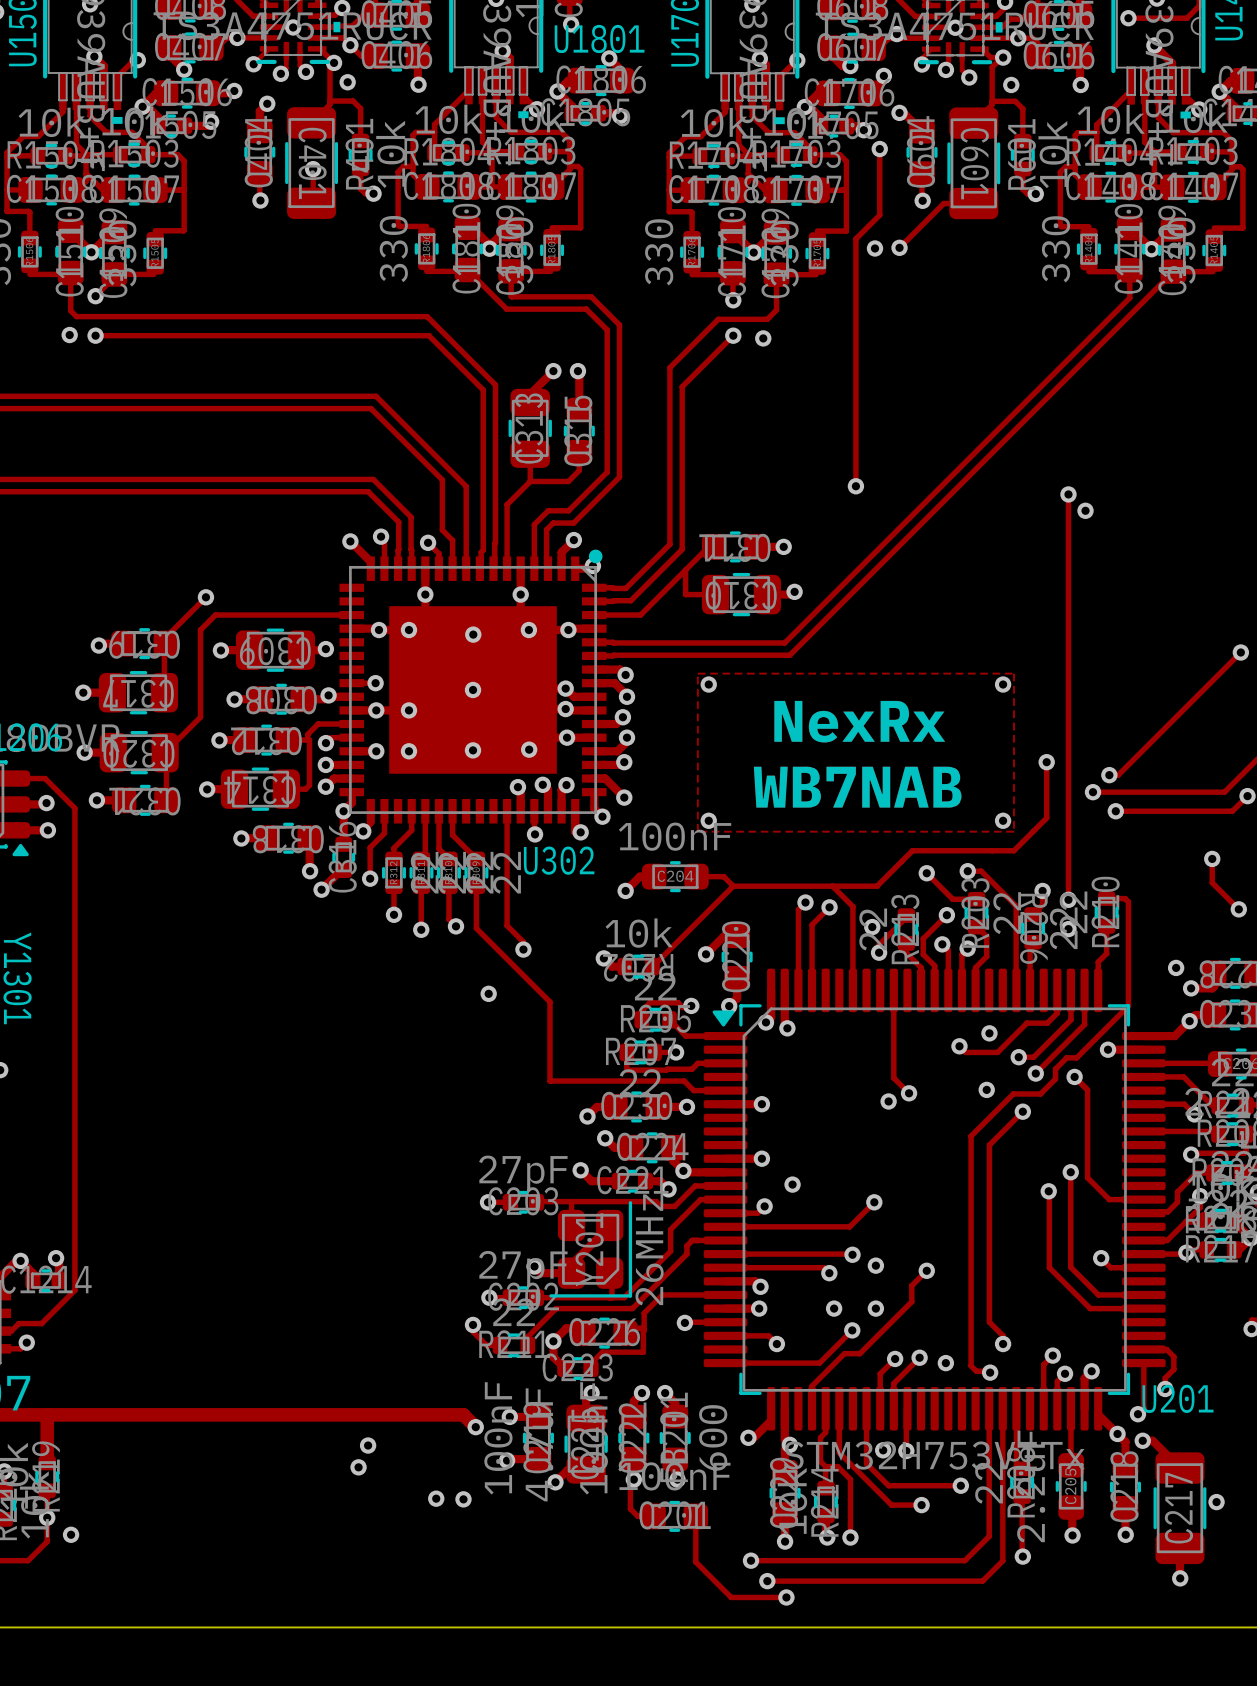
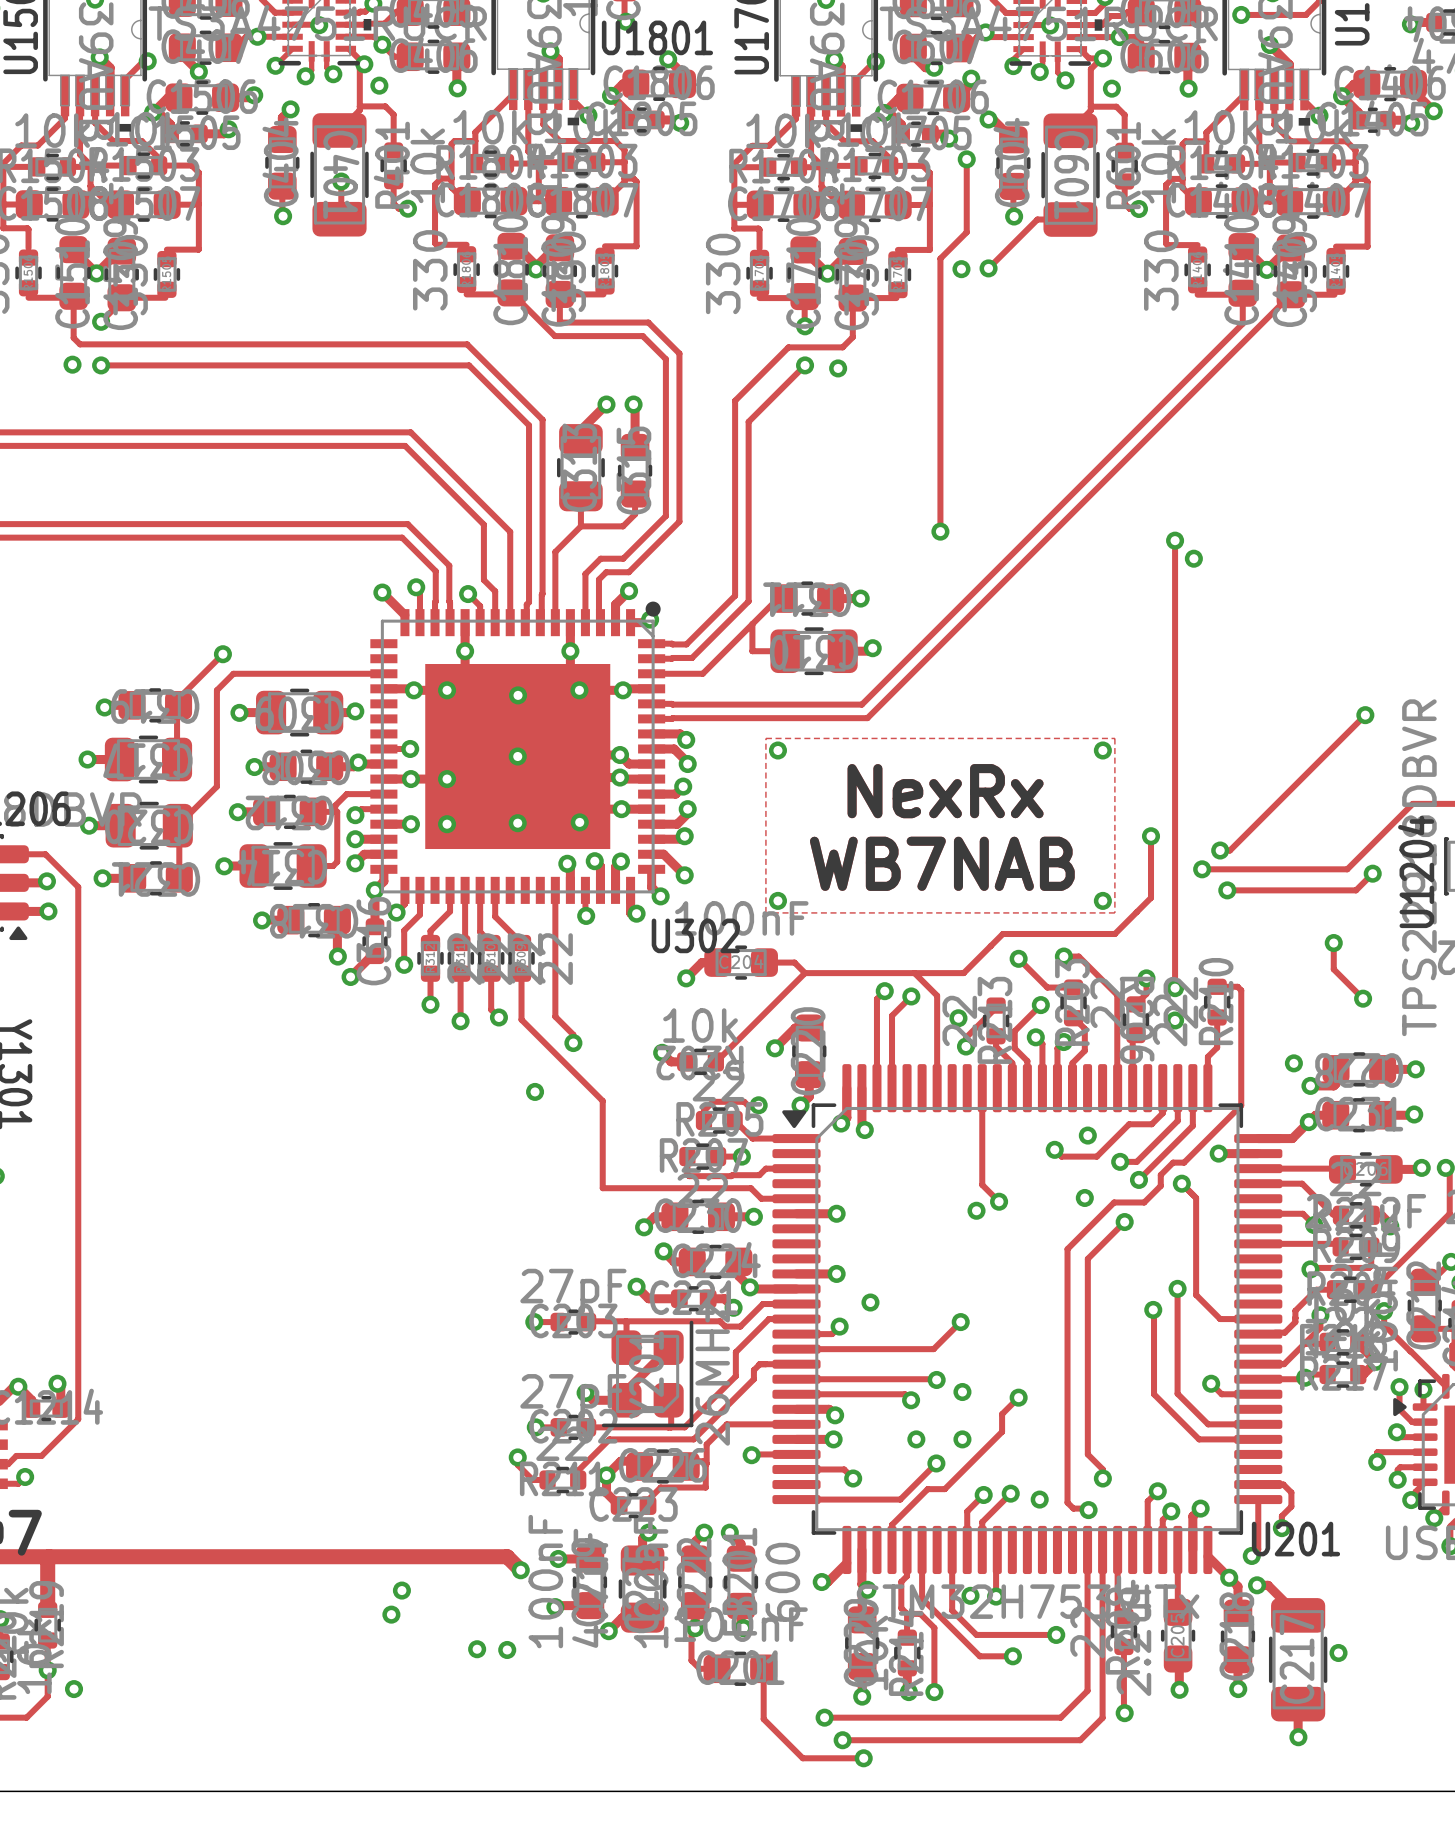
U302 name position: U302 (559, 860) -> U302 (695, 935)

